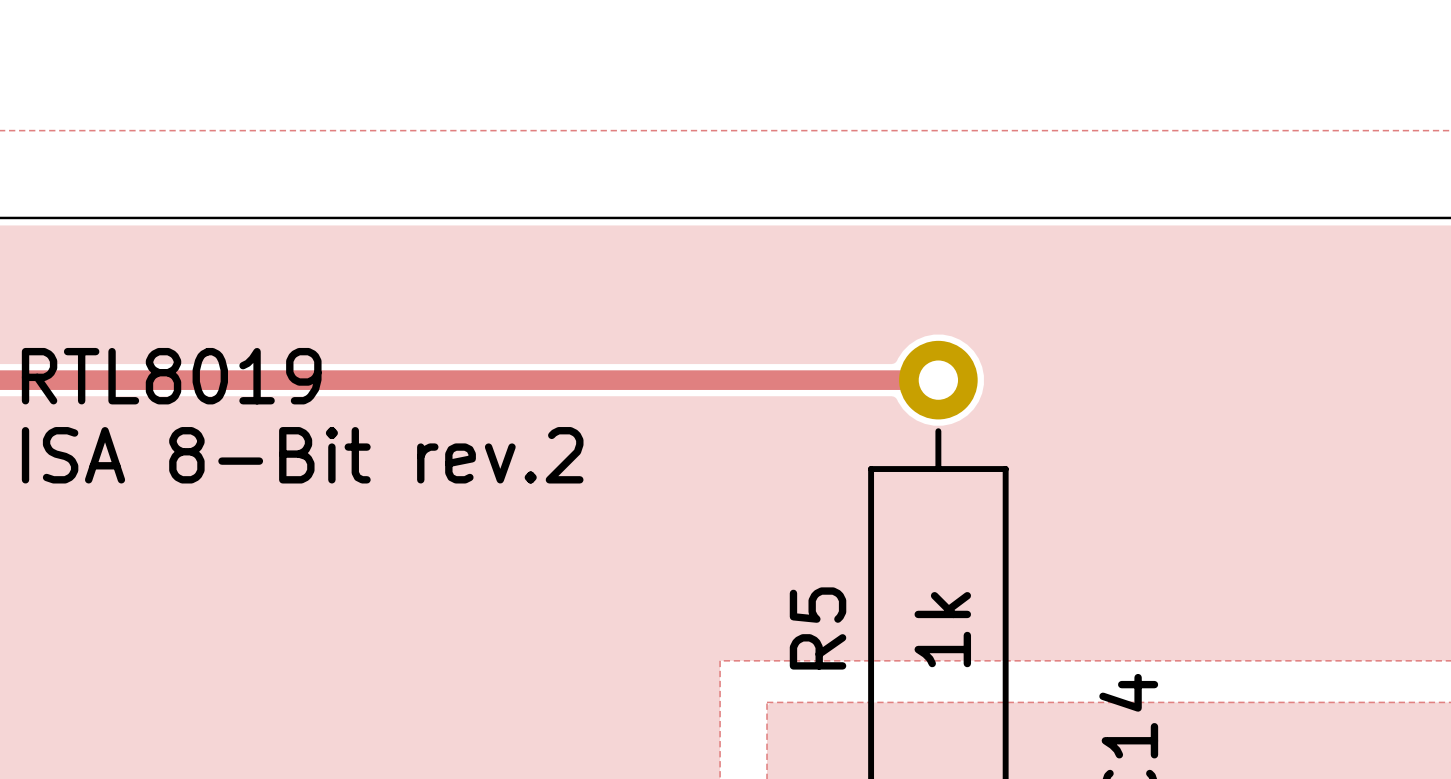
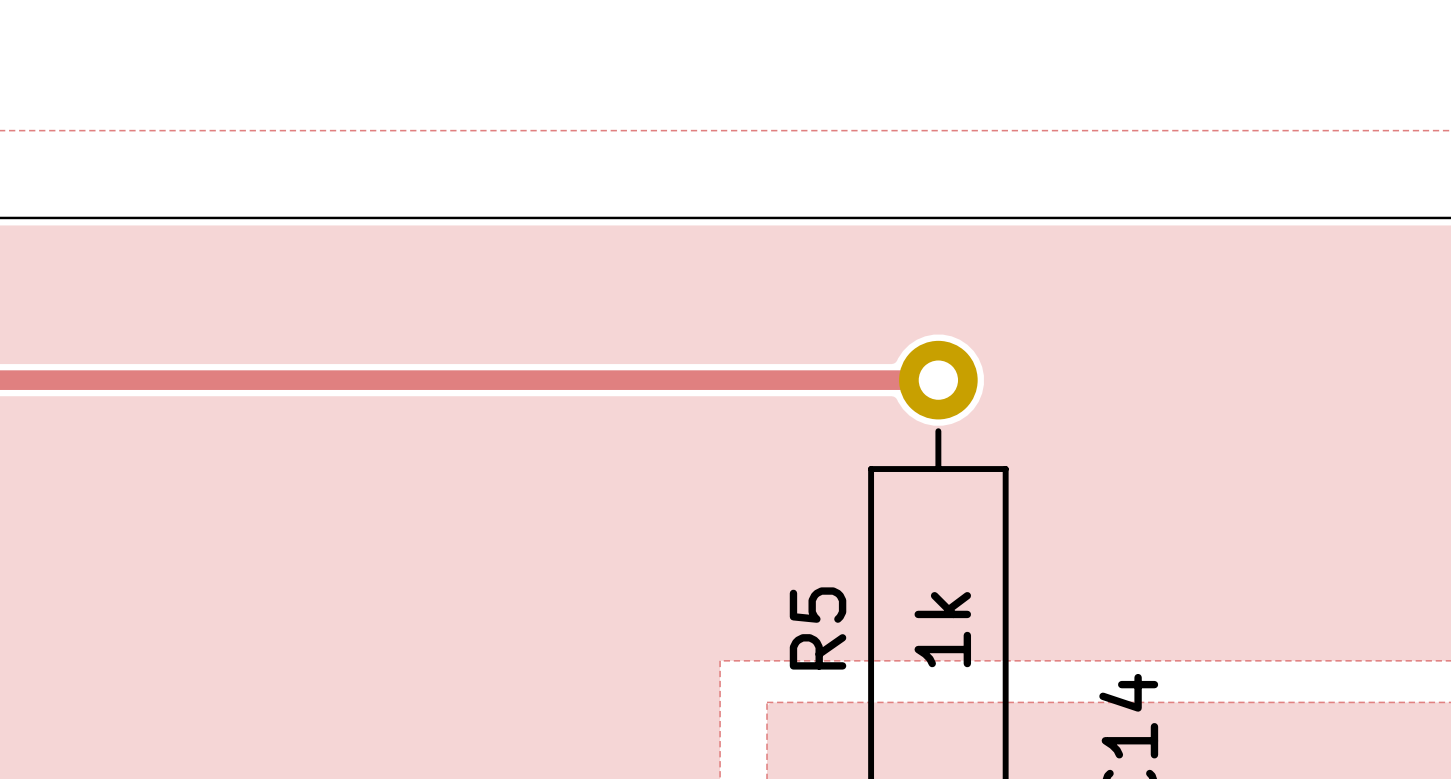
text: RTL8019 (171, 376) -> none
text: ISA 8-Bit rev.2 (302, 455) -> none

